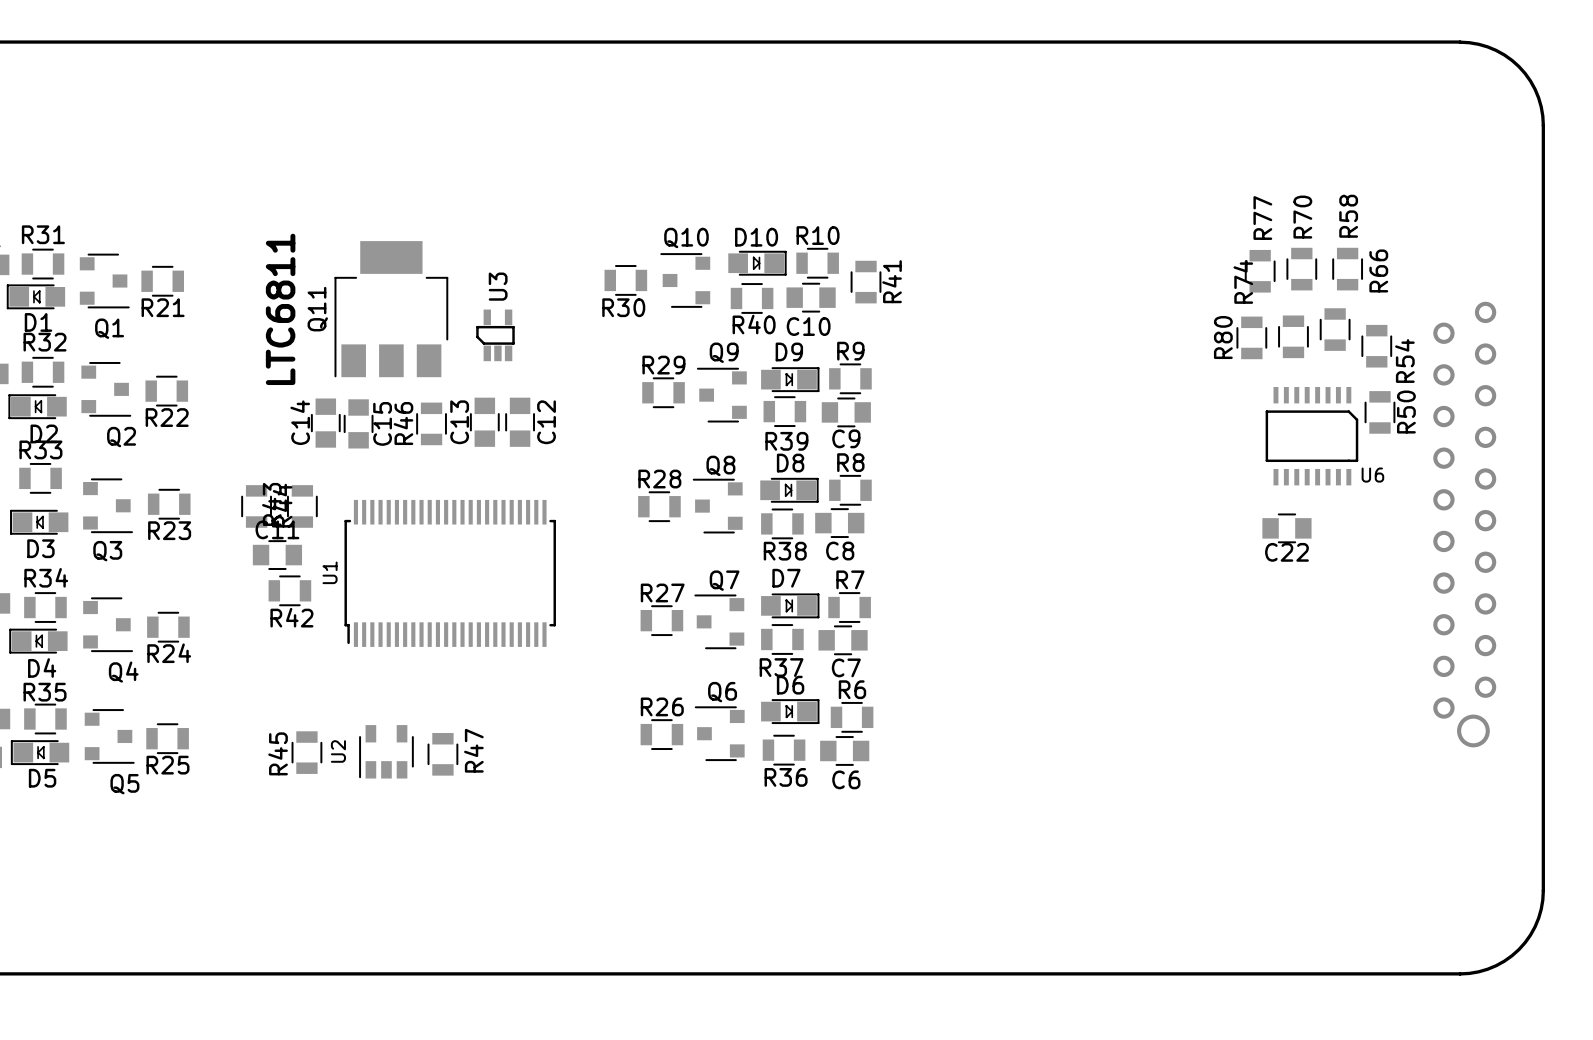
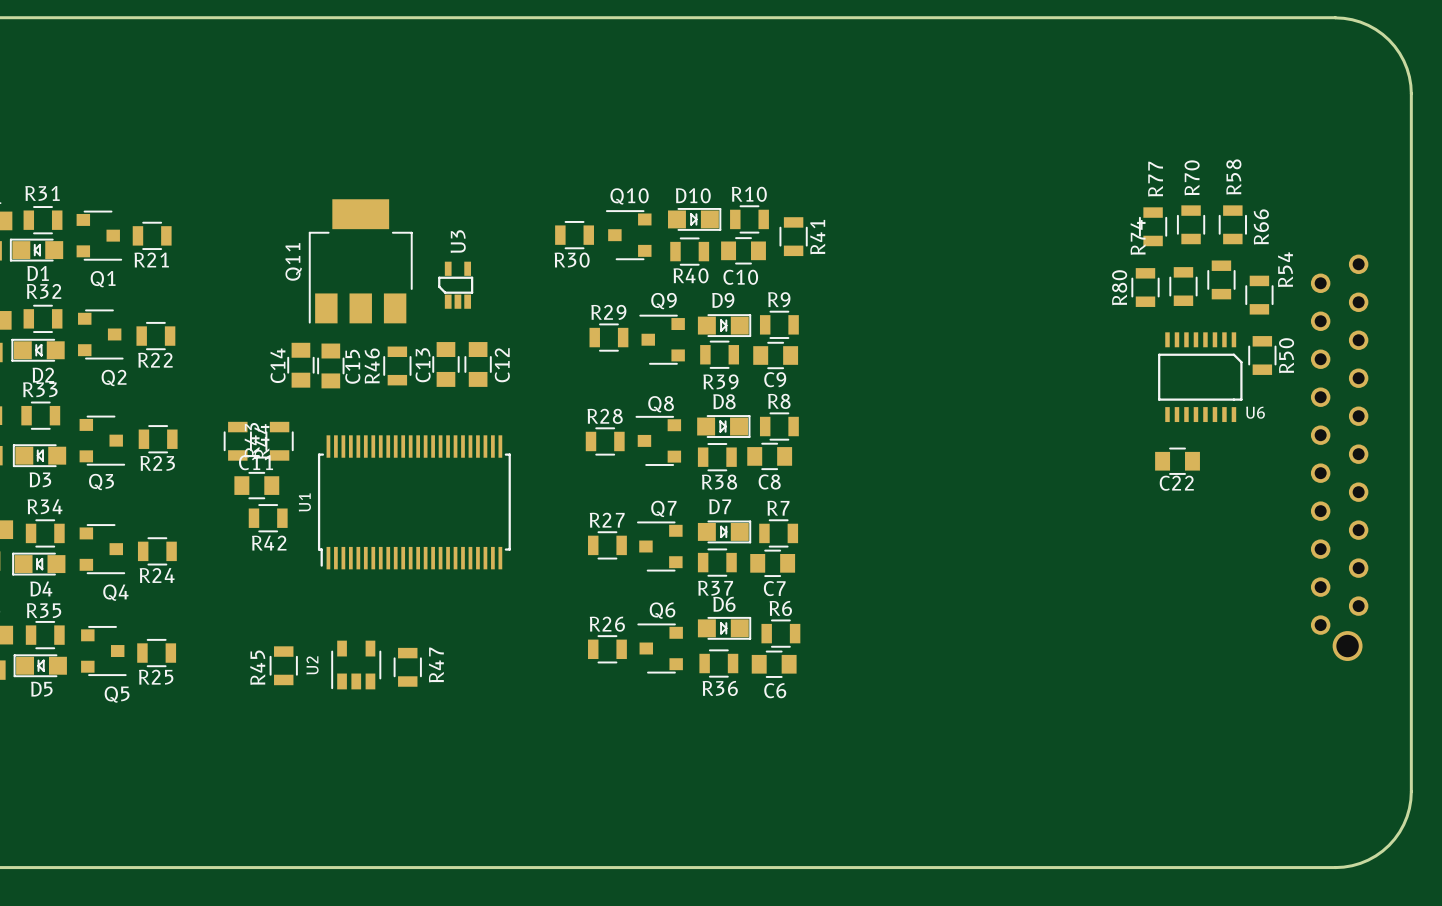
text: LTC6811 (280, 309) -> none
R54 name position: R54 (1404, 361) -> R54 (1285, 269)

